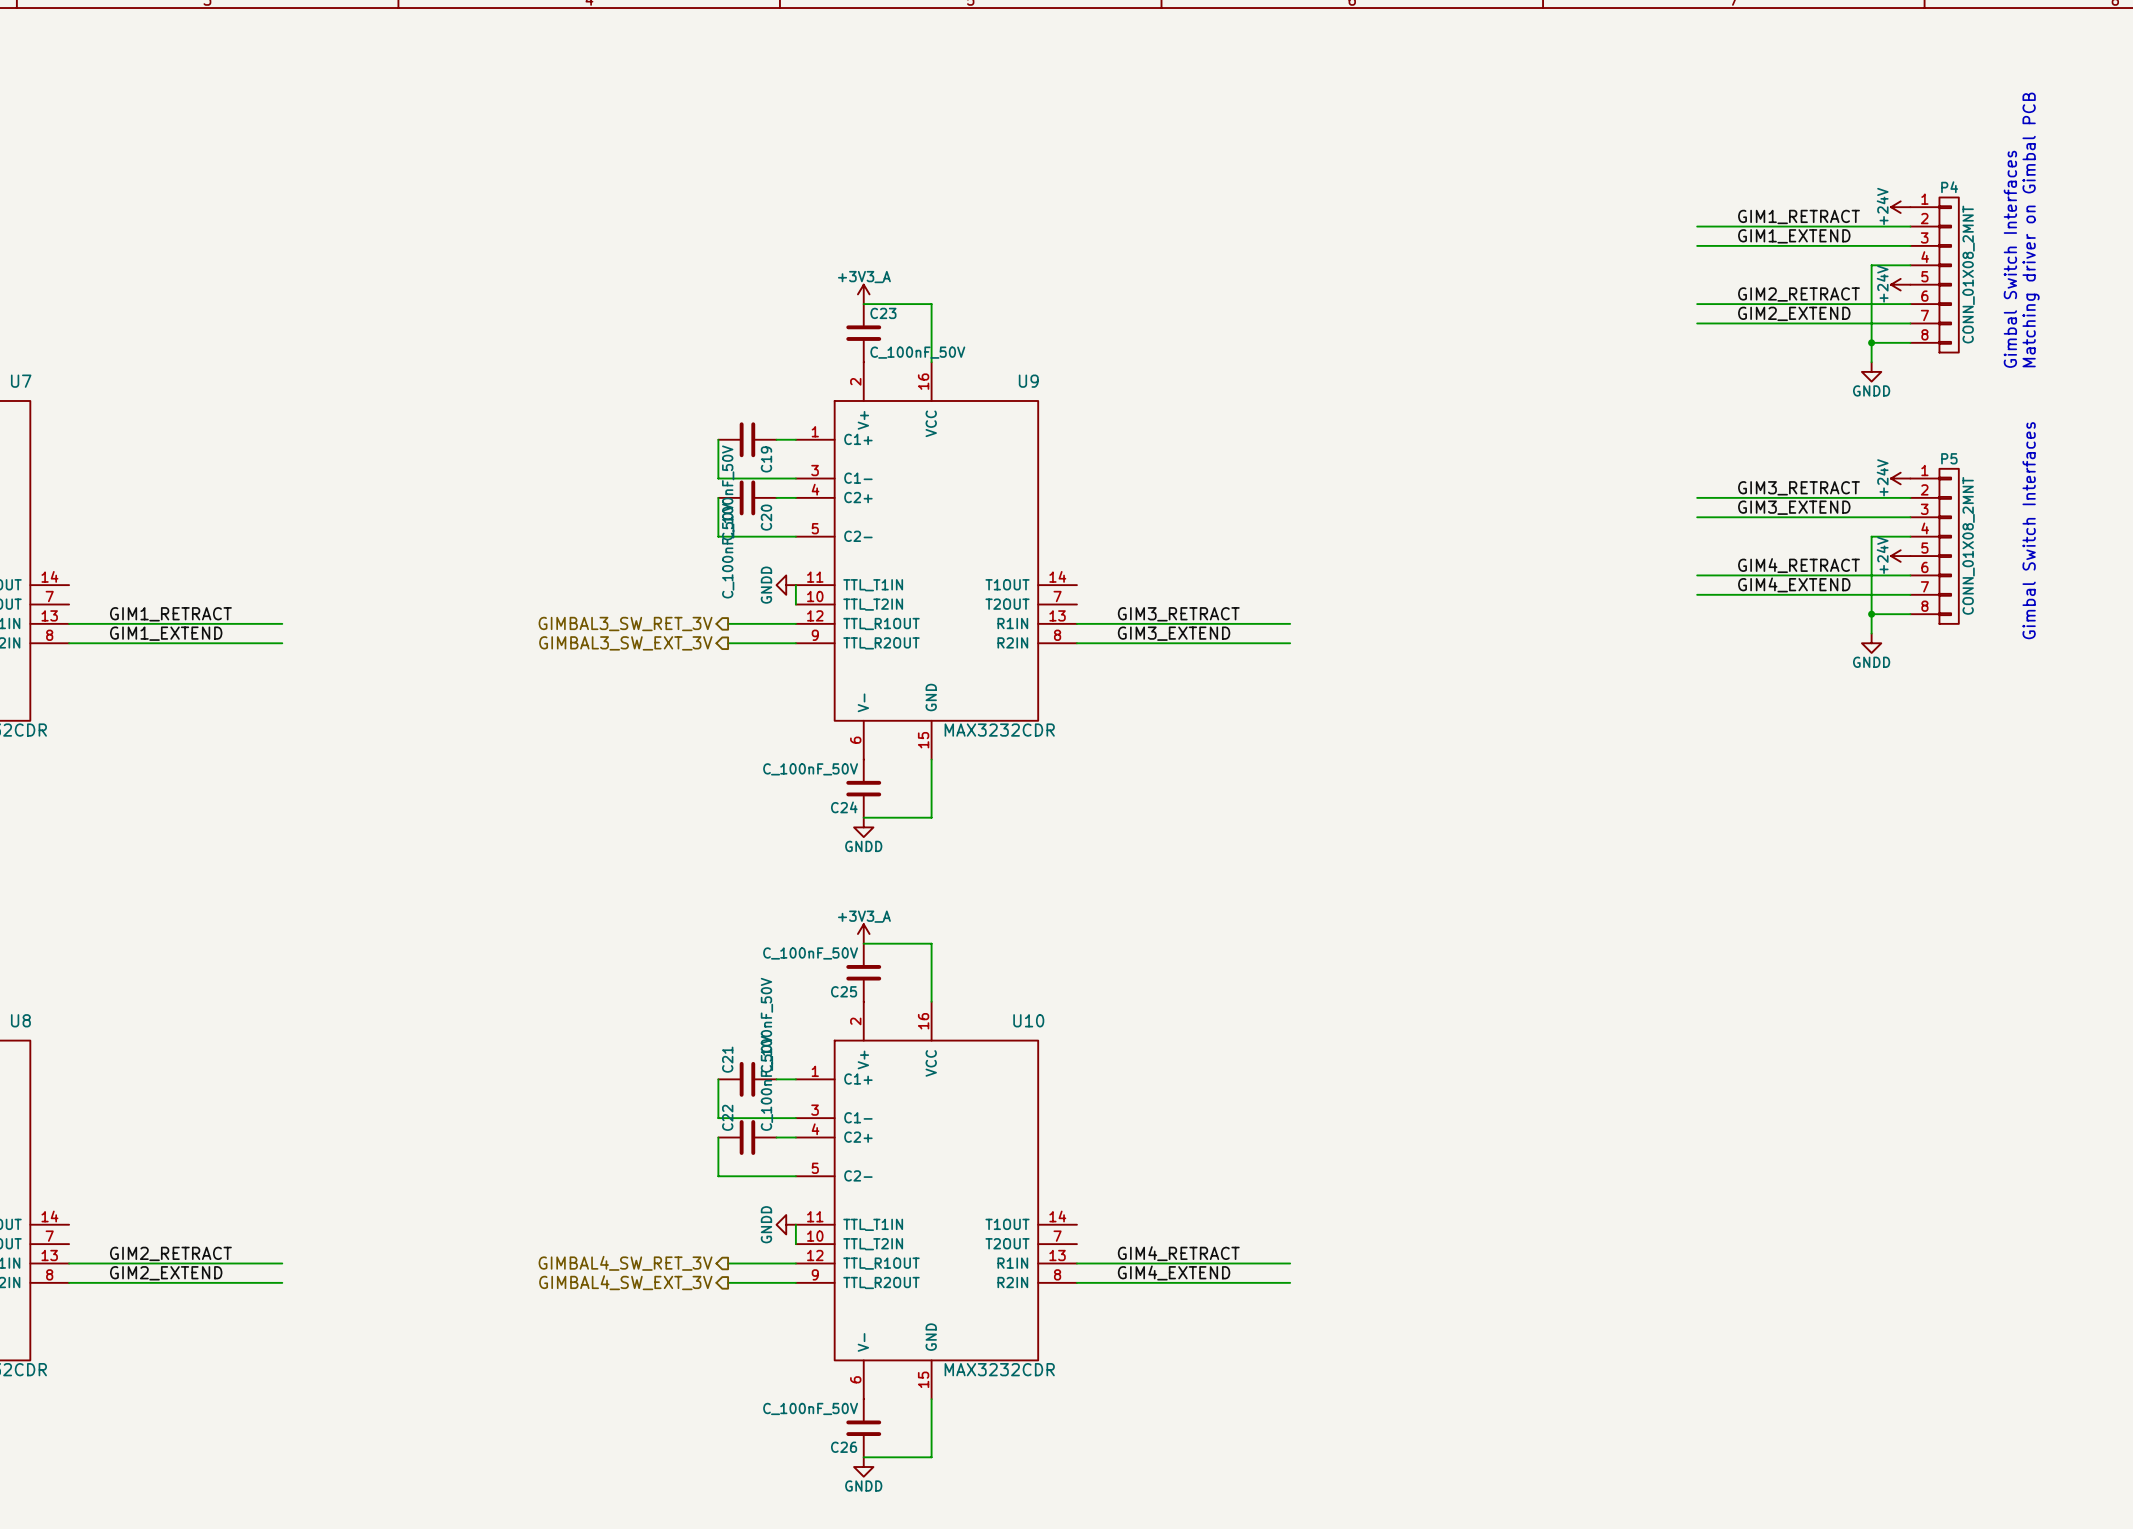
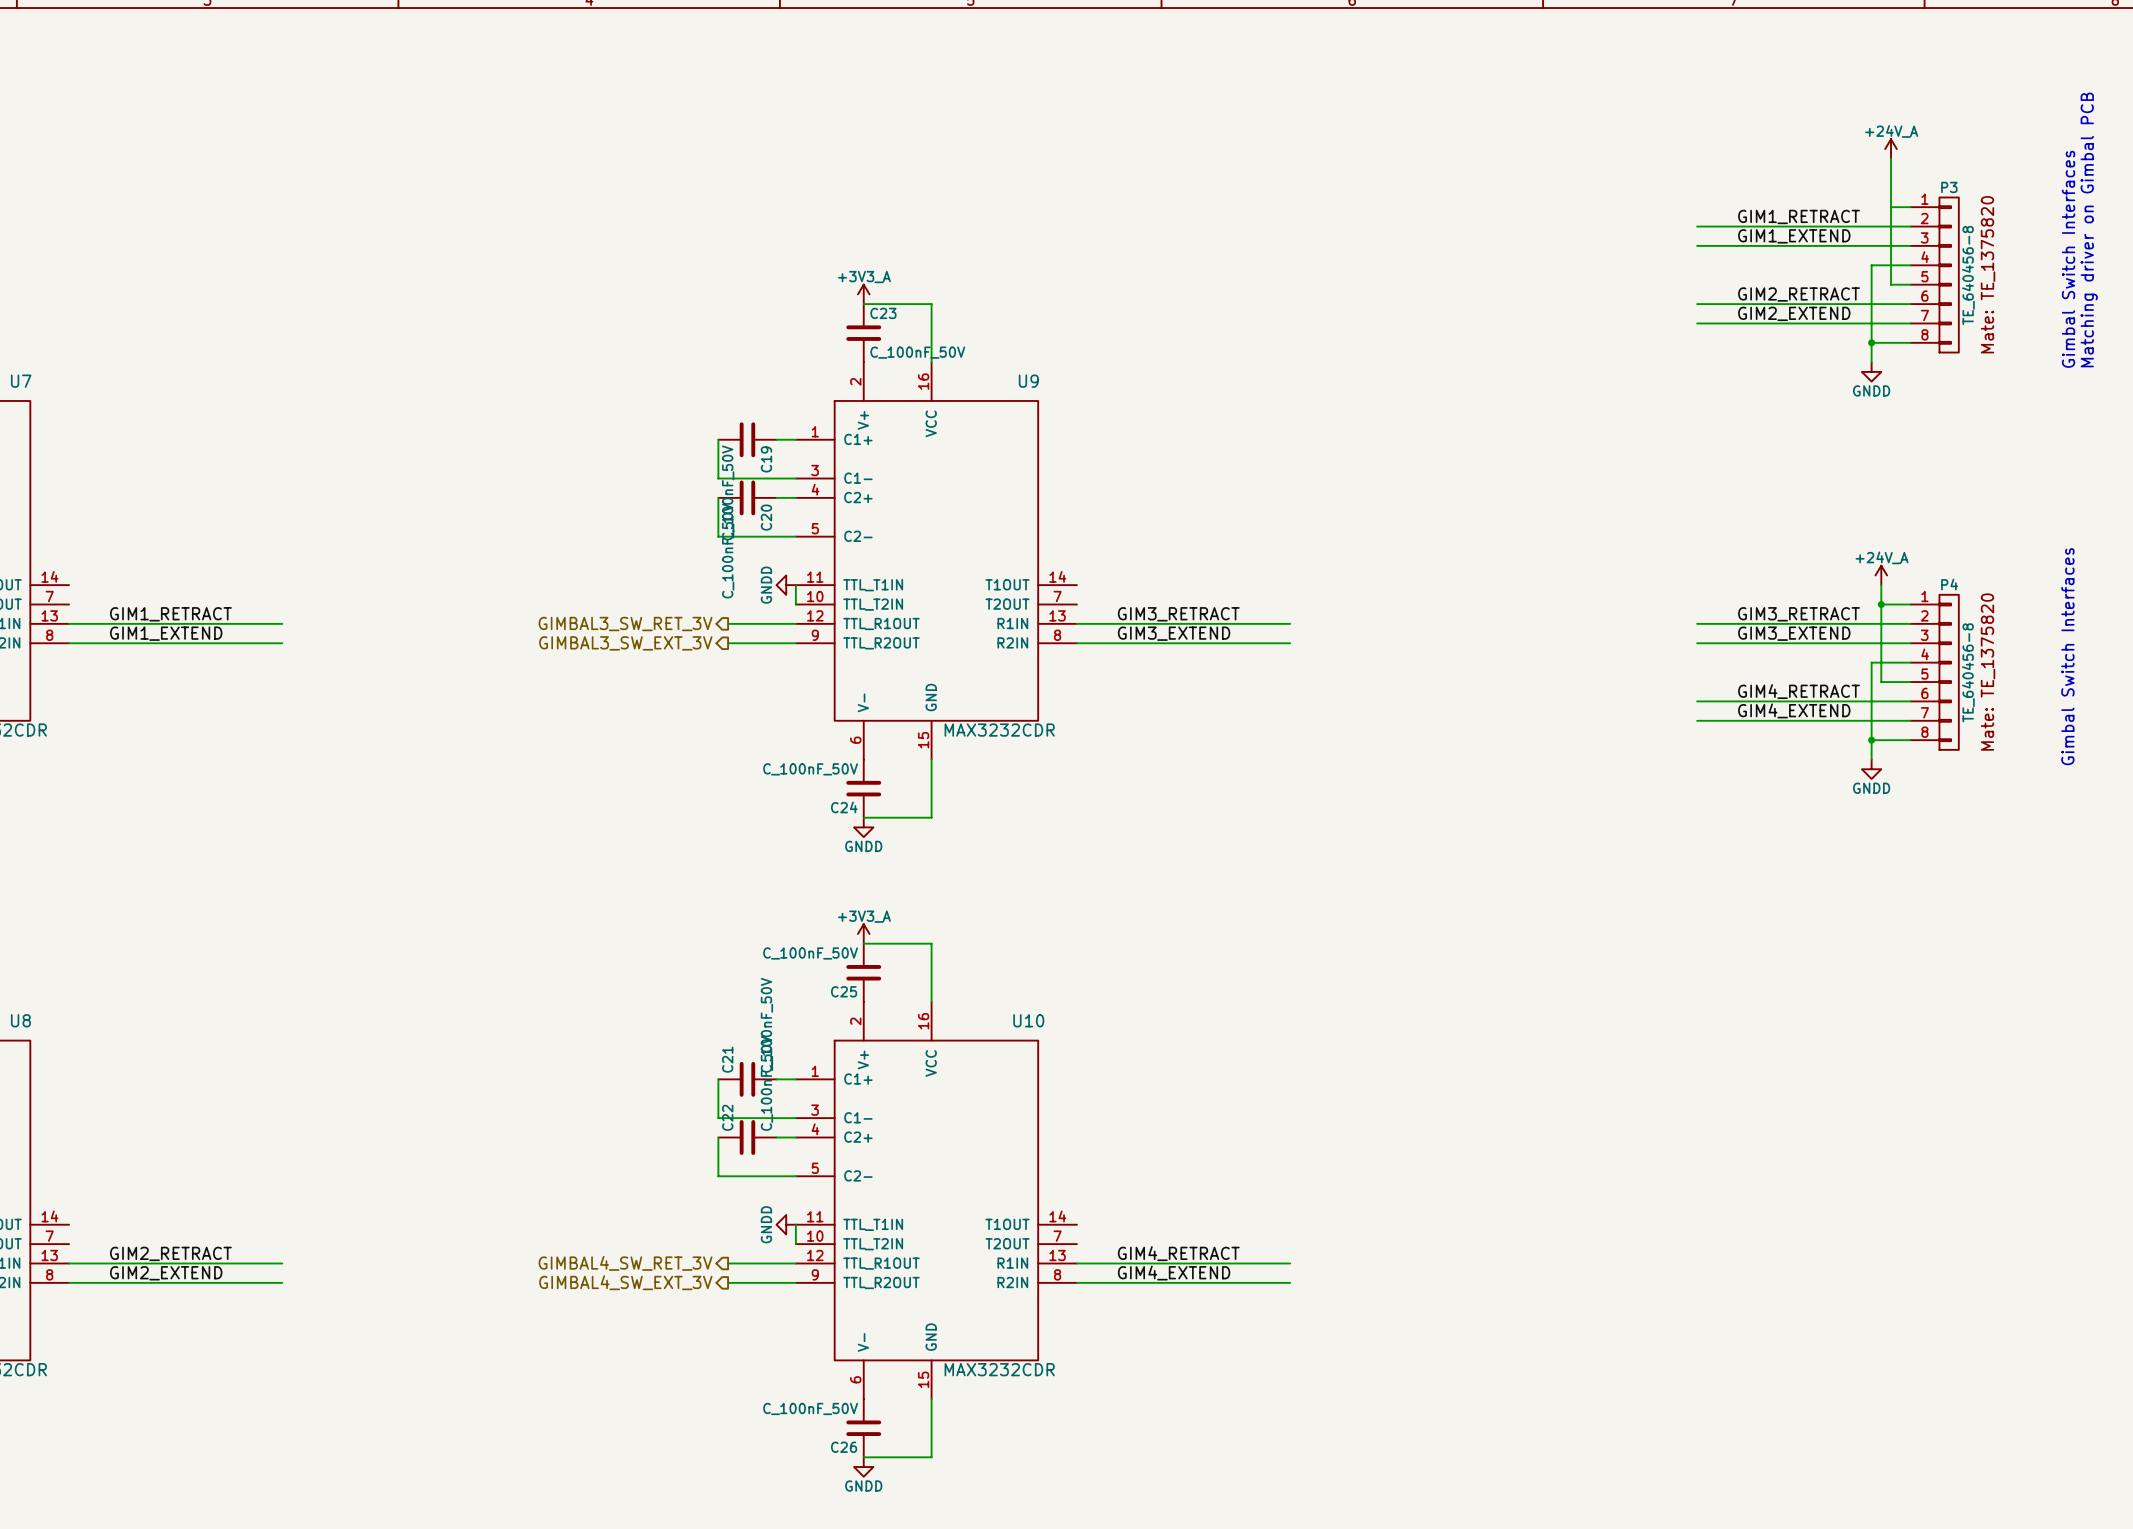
power symbol: none -> +24V_A (1891, 149)
wire: none -> (1891, 158) (1891, 284) (1910, 284)
power symbol: +24V (1900, 207) -> none
text position: Matching driver on Gimbal PCB (2031, 229) -> Matching driver on Gimbal PCB (2089, 229)
text position: Gimbal Switch Interfaces (2010, 259) -> Gimbal Switch Interfaces (2068, 259)
P4 value: CONN_01X08_2MNT (1968, 274) -> TE_640456-8 (1968, 672)
P4 position: (1934, 275) -> (1934, 672)
P3: none -> TE_640456-8 (1934, 275)
power symbol: +24V (1900, 284) -> none
power symbol: +24V (1900, 478) -> none
label position: GIM3_RETRACT (1799, 488) -> GIM3_RETRACT (1799, 614)
wire: (1697, 497) (1910, 497) -> (1697, 623) (1910, 623)
label position: GIM3_EXTEND (1794, 507) -> GIM3_EXTEND (1794, 633)
wire: (1697, 517) (1910, 517) -> (1697, 643) (1910, 643)
text position: Gimbal Switch Interfaces (2029, 530) -> Gimbal Switch Interfaces (2067, 656)
wire: (1910, 536) (1871, 536) (1871, 633) -> (1910, 662) (1871, 662) (1871, 759)
P5: CONN_01X08_2MNT (1934, 546) -> none
power symbol: +24V (1900, 556) -> none
label position: GIM4_RETRACT (1799, 565) -> GIM4_RETRACT (1799, 691)
wire: (1697, 575) (1910, 575) -> (1697, 701) (1910, 701)
power symbol: none -> +24V_A (1881, 575)
label position: GIM4_EXTEND (1794, 584) -> GIM4_EXTEND (1794, 710)
wire: none -> (1881, 585) (1881, 682) (1910, 682)
wire: (1697, 594) (1910, 594) -> (1697, 720) (1910, 720)
wire: none -> (1881, 604) (1910, 604)
wire: (1871, 614) (1910, 614) -> (1871, 740) (1910, 740)
junction position: (1871, 614) -> (1881, 604)
power symbol position: GNDD (1871, 643) -> GNDD (1871, 769)
P4 text: none -> Mate: TE_1375820 (1988, 672)
junction: none -> (1871, 740)

